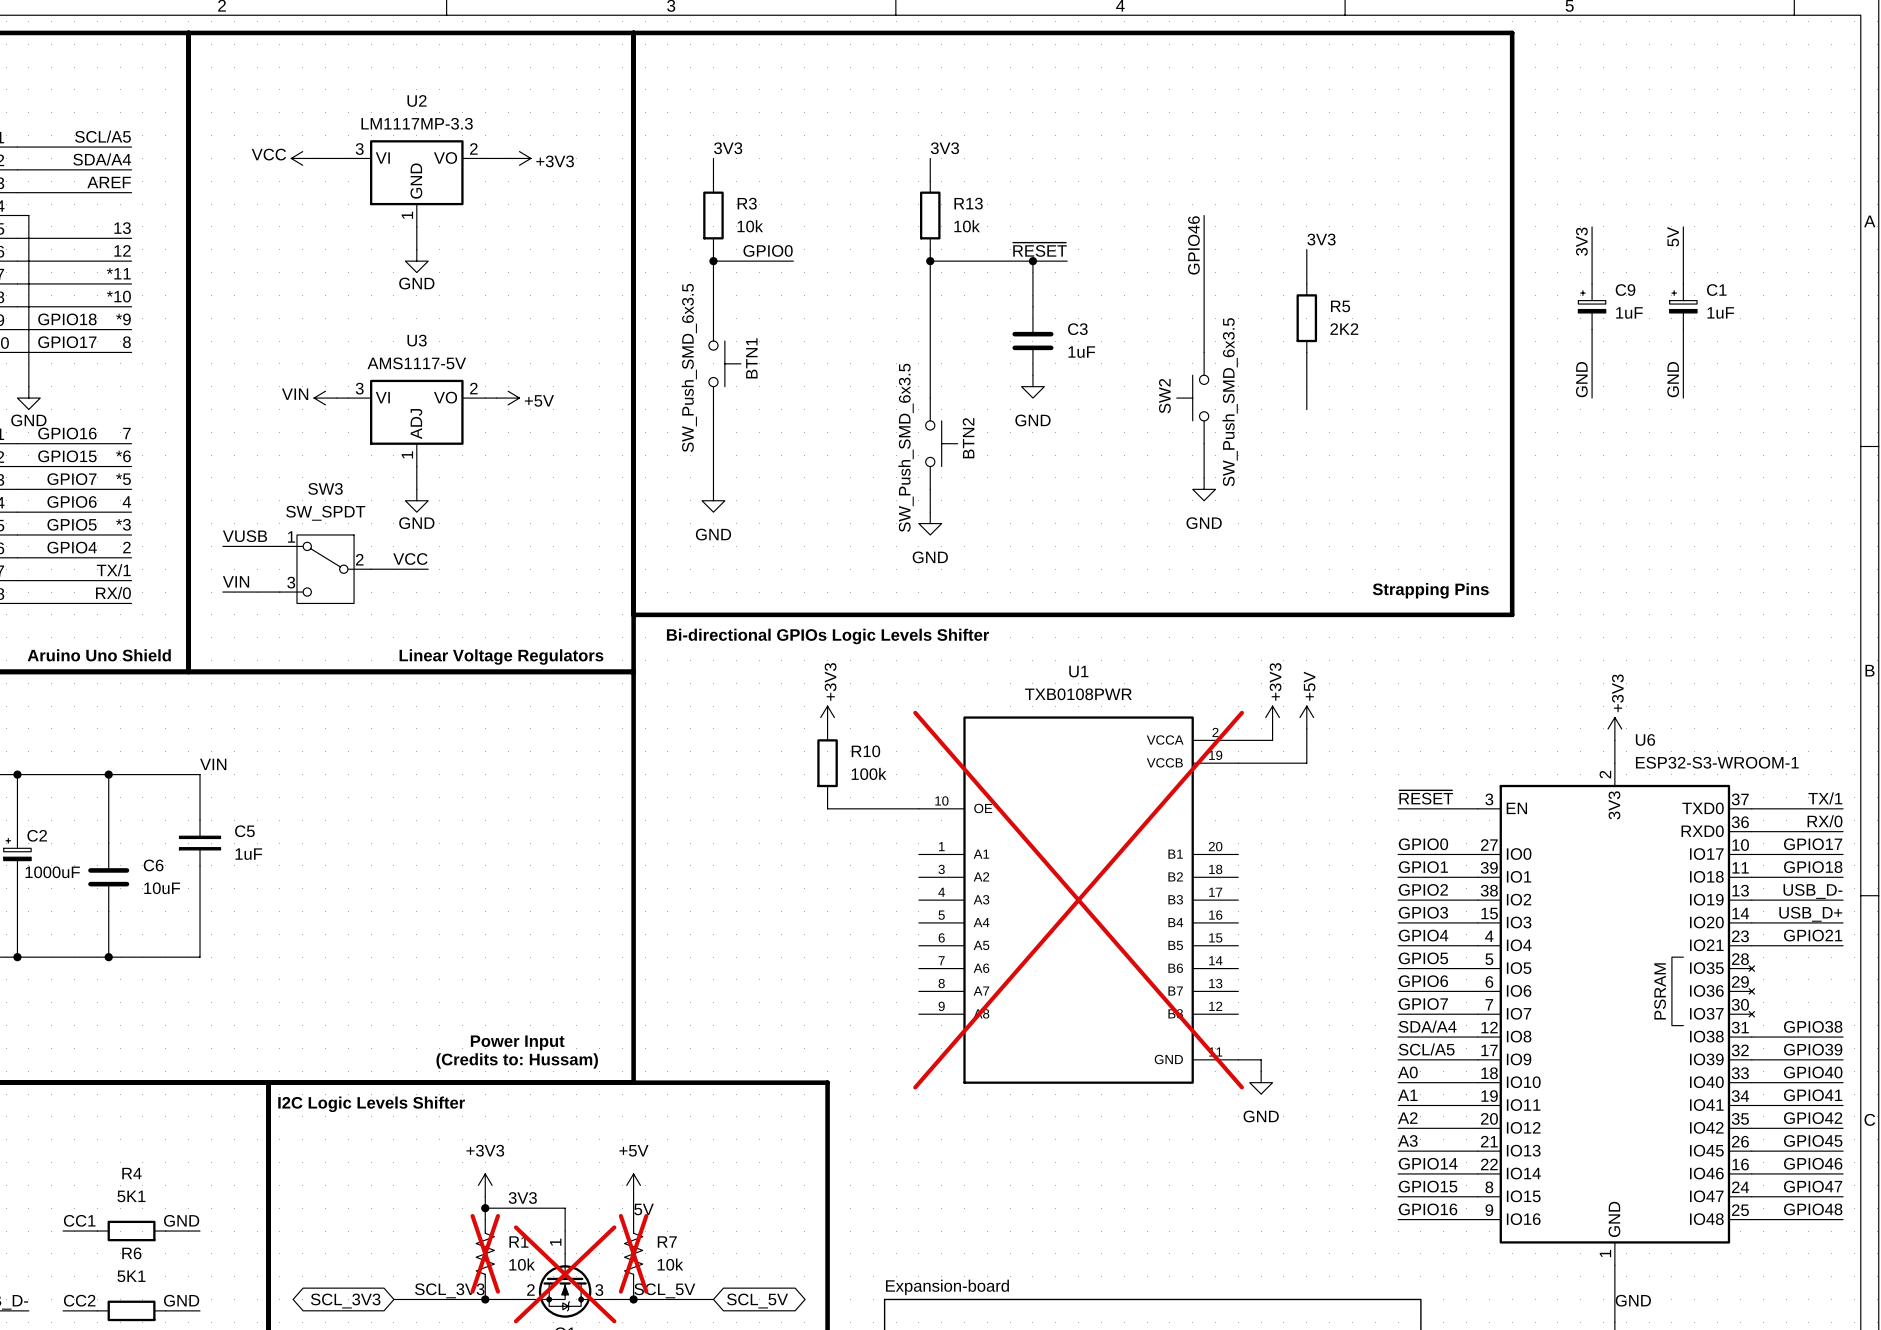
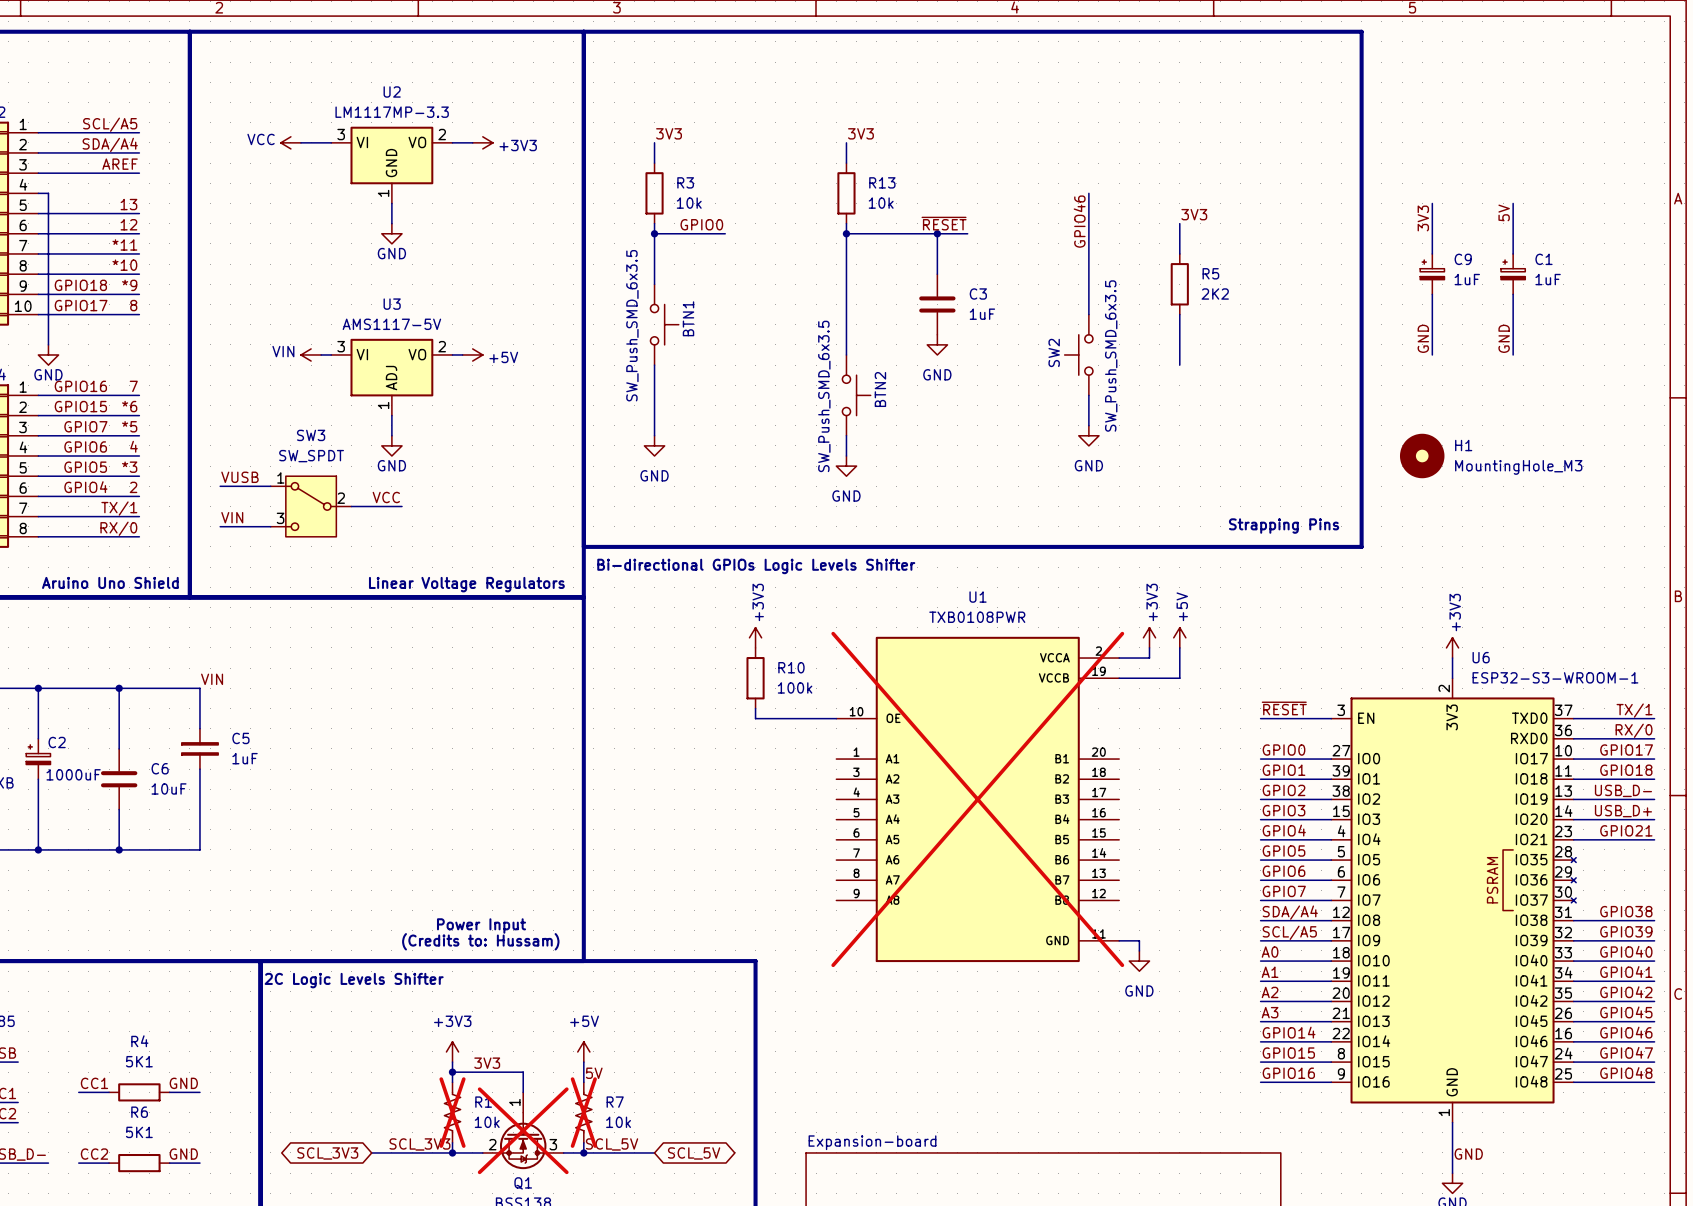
H1: none -> MountingHole_M3 (1422, 456)

